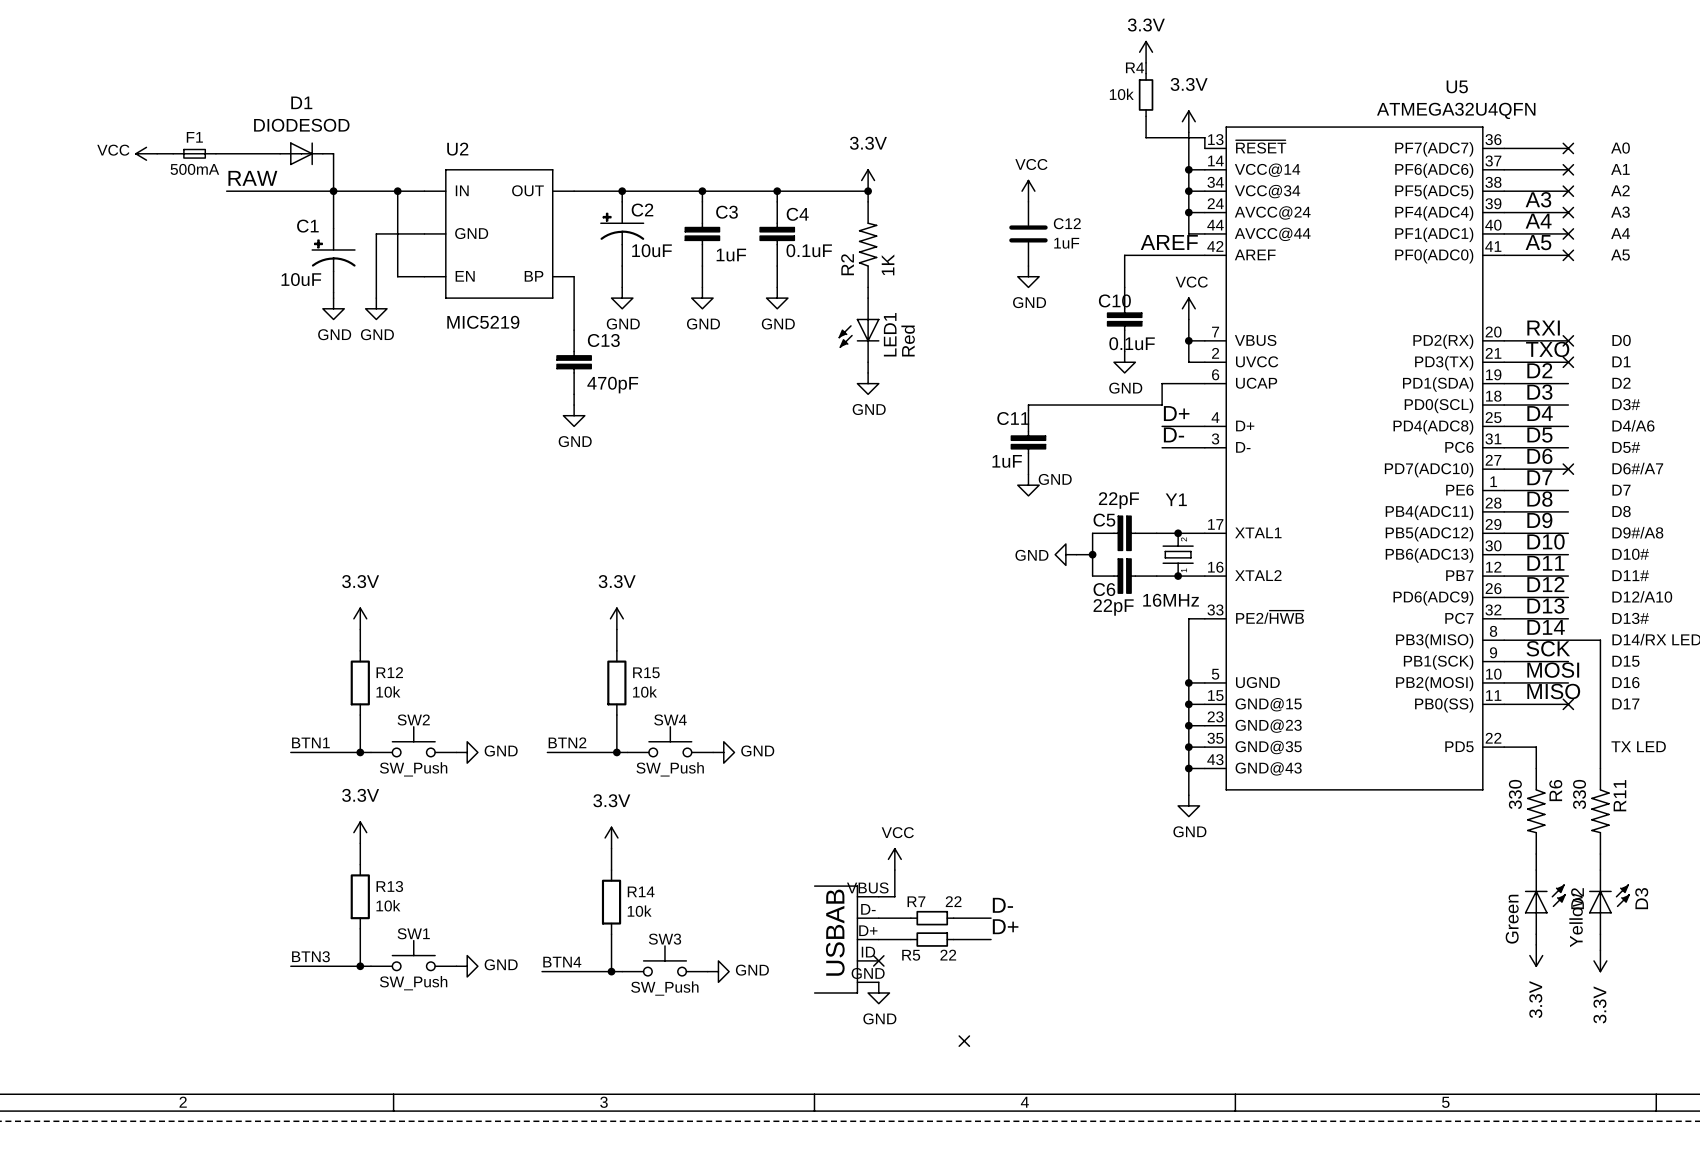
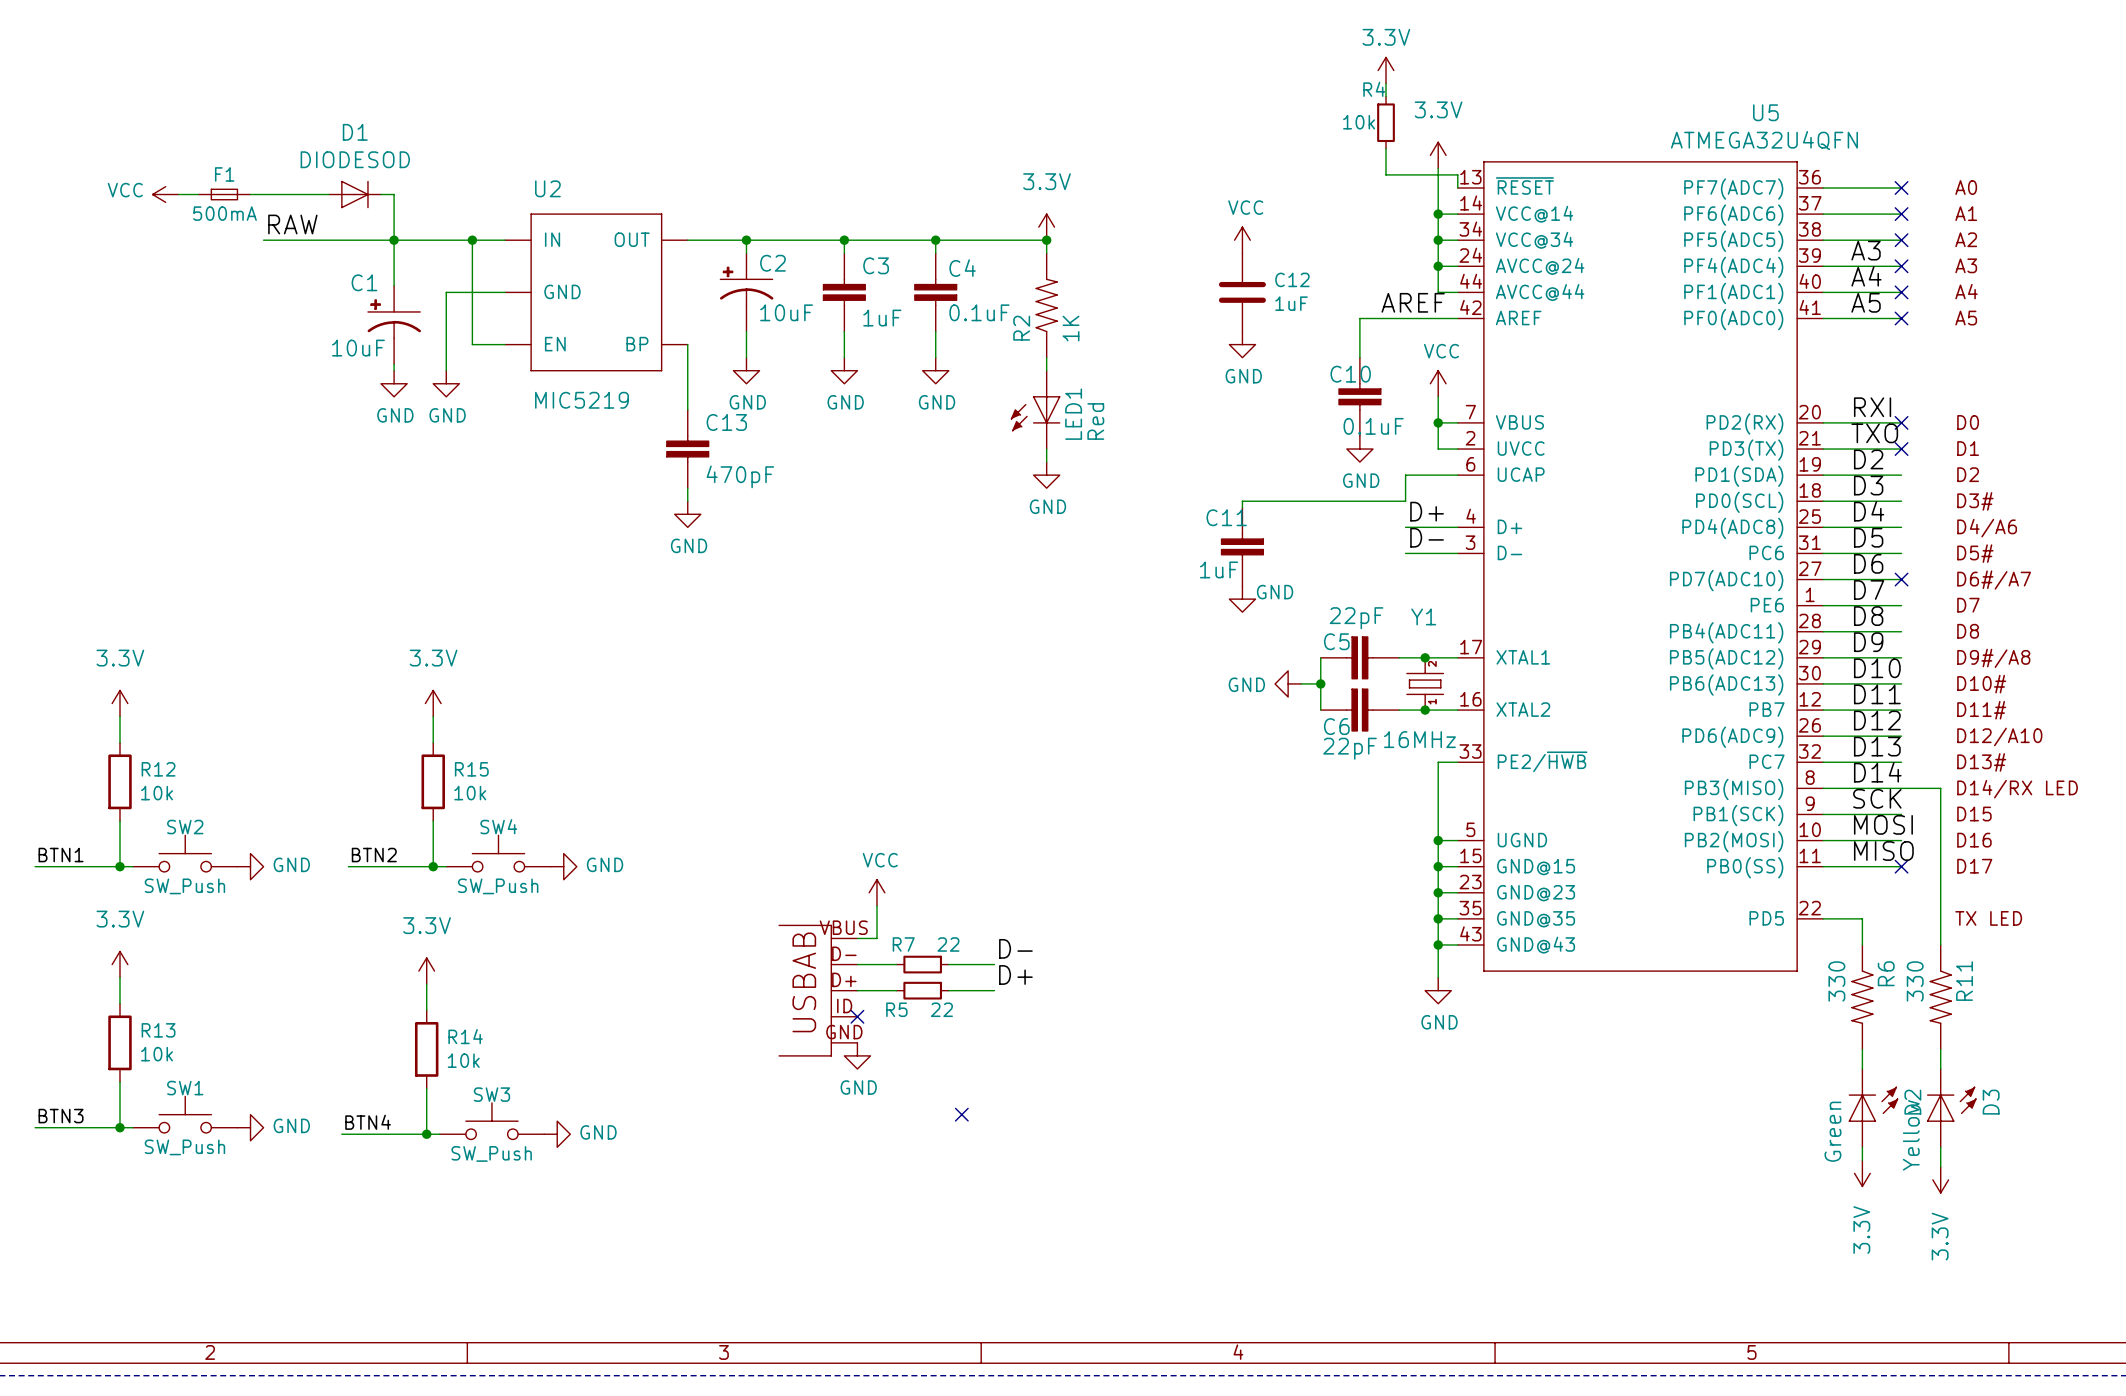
power symbol: none -> 3.3V (119, 703)
wire: none -> (119, 716) (119, 742)
power symbol position: 3.3V (360, 618) -> 3.3V (433, 703)
power symbol: 3.3V (616, 618) -> none
wire: (360, 629) (360, 650) -> (433, 716) (433, 742)
wire: (616, 629) (616, 650) -> none
wire: none -> (119, 820) (119, 866)
R12 position: (360, 682) -> (119, 781)
R15 position: (616, 682) -> (433, 781)
label: none -> BTN1 (61, 855)
label: none -> BTN2 (374, 855)
wire: none -> (35, 866) (133, 866)
junction: none -> (119, 866)
power symbol: none -> GND (250, 866)
wire: (360, 715) (360, 752) -> (433, 820) (433, 866)
wire: (616, 715) (616, 752) -> none
power symbol: none -> VCC (876, 892)
wire: none -> (876, 905) (876, 938) (857, 938)
SW2 position: (413, 741) -> (185, 853)
SW4 position: (670, 741) -> (498, 853)
label: BTN1 (310, 742) -> none
label: BTN2 (567, 742) -> none
wire: (290, 752) (370, 752) -> (348, 866) (446, 866)
junction position: (360, 752) -> (433, 866)
power symbol position: GND (467, 752) -> GND (563, 866)
wire: (547, 752) (627, 752) -> none
junction: (616, 752) -> none
power symbol: GND (723, 752) -> none
label: none -> D- (1015, 948)
power symbol: none -> 3.3V (119, 964)
wire: none -> (857, 964) (896, 964)
wire: none -> (948, 964) (994, 964)
label: none -> D+ (1015, 974)
wire: none -> (119, 977) (119, 1003)
part: none -> (818, 990)
no-connect mark: none -> (857, 1016)
power symbol position: 3.3V (360, 832) -> 3.3V (426, 971)
power symbol: 3.3V (611, 837) -> none
wire: (360, 843) (360, 864) -> (426, 984) (426, 1010)
wire: (611, 848) (611, 870) -> none
power symbol: none -> GND (857, 1055)
power symbol: VCC (894, 859) -> none
wire: (894, 870) (894, 896) (878, 896) -> none
wire: none -> (119, 1082) (119, 1127)
R13 position: (360, 896) -> (119, 1042)
R14 position: (611, 902) -> (426, 1049)
label: D- (1002, 905) -> none
no-connect mark: none -> (961, 1114)
label: none -> BTN3 (61, 1116)
label: none -> BTN4 (368, 1122)
wire: none -> (35, 1127) (133, 1127)
junction: none -> (119, 1127)
power symbol: none -> GND (250, 1127)
wire: (878, 918) (910, 918) -> (857, 990) (896, 990)
R5 position: (932, 918) -> (922, 964)
wire: (953, 918) (991, 918) -> (948, 990) (994, 990)
label: D+ (1005, 926) -> none
wire: (360, 928) (360, 966) -> (426, 1088) (426, 1134)
wire: (611, 934) (611, 971) -> none
part: (846, 939) -> none
wire: (878, 939) (910, 939) -> none
R7 position: (932, 939) -> (922, 990)
wire: (953, 939) (991, 939) -> none
SW1 position: (413, 955) -> (185, 1114)
label: BTN3 (310, 956) -> none
SW3 position: (664, 960) -> (491, 1121)
no-connect mark: (878, 960) -> none
label: BTN4 (562, 962) -> none
wire: (290, 966) (370, 966) -> (341, 1134) (439, 1134)
junction position: (360, 966) -> (426, 1134)
power symbol position: GND (467, 966) -> GND (557, 1134)
wire: (542, 971) (622, 971) -> none
junction: (611, 971) -> none
power symbol: GND (718, 971) -> none
power symbol: GND (878, 992) -> none
no-connect mark: (964, 1041) -> none

